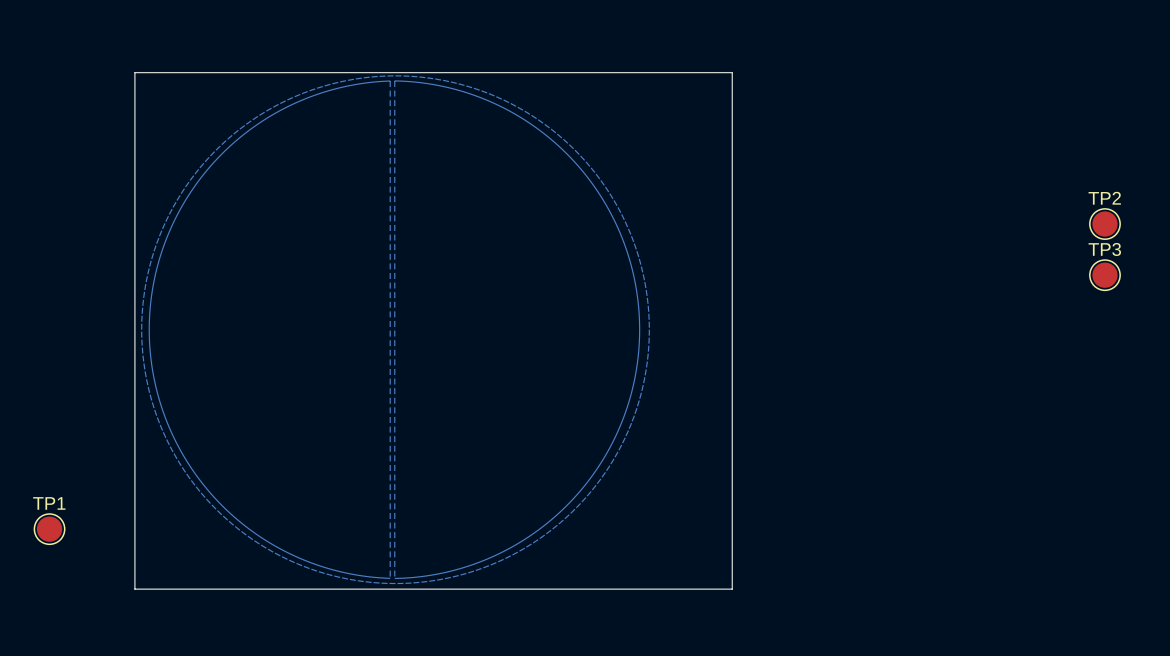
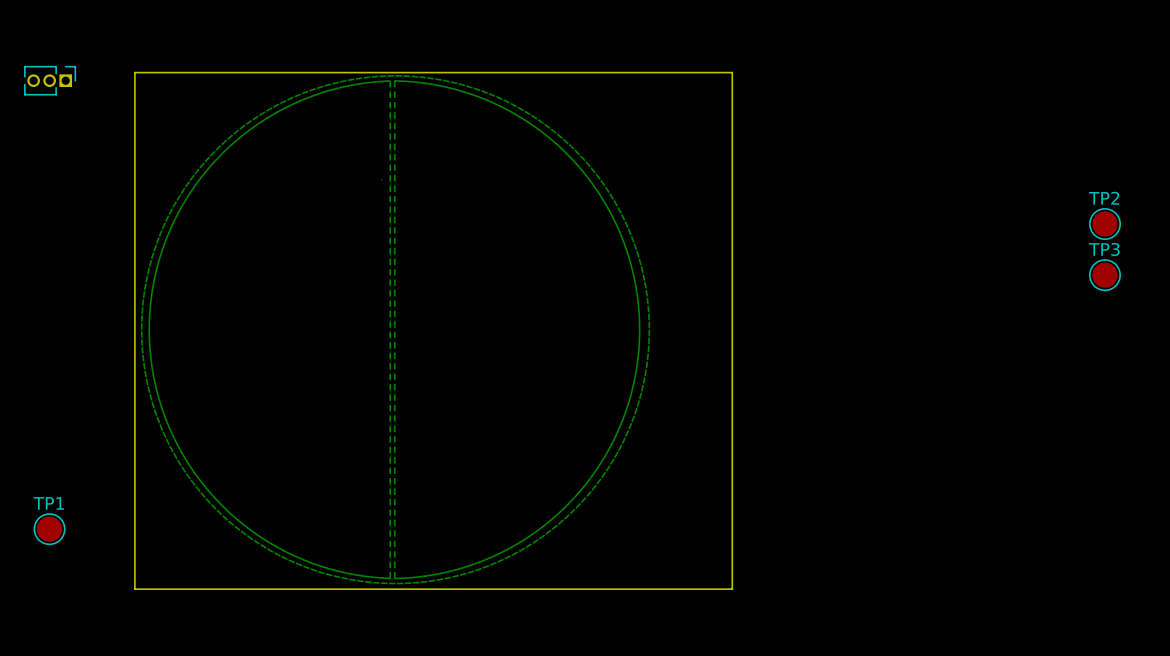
part: none -> (50, 80)

